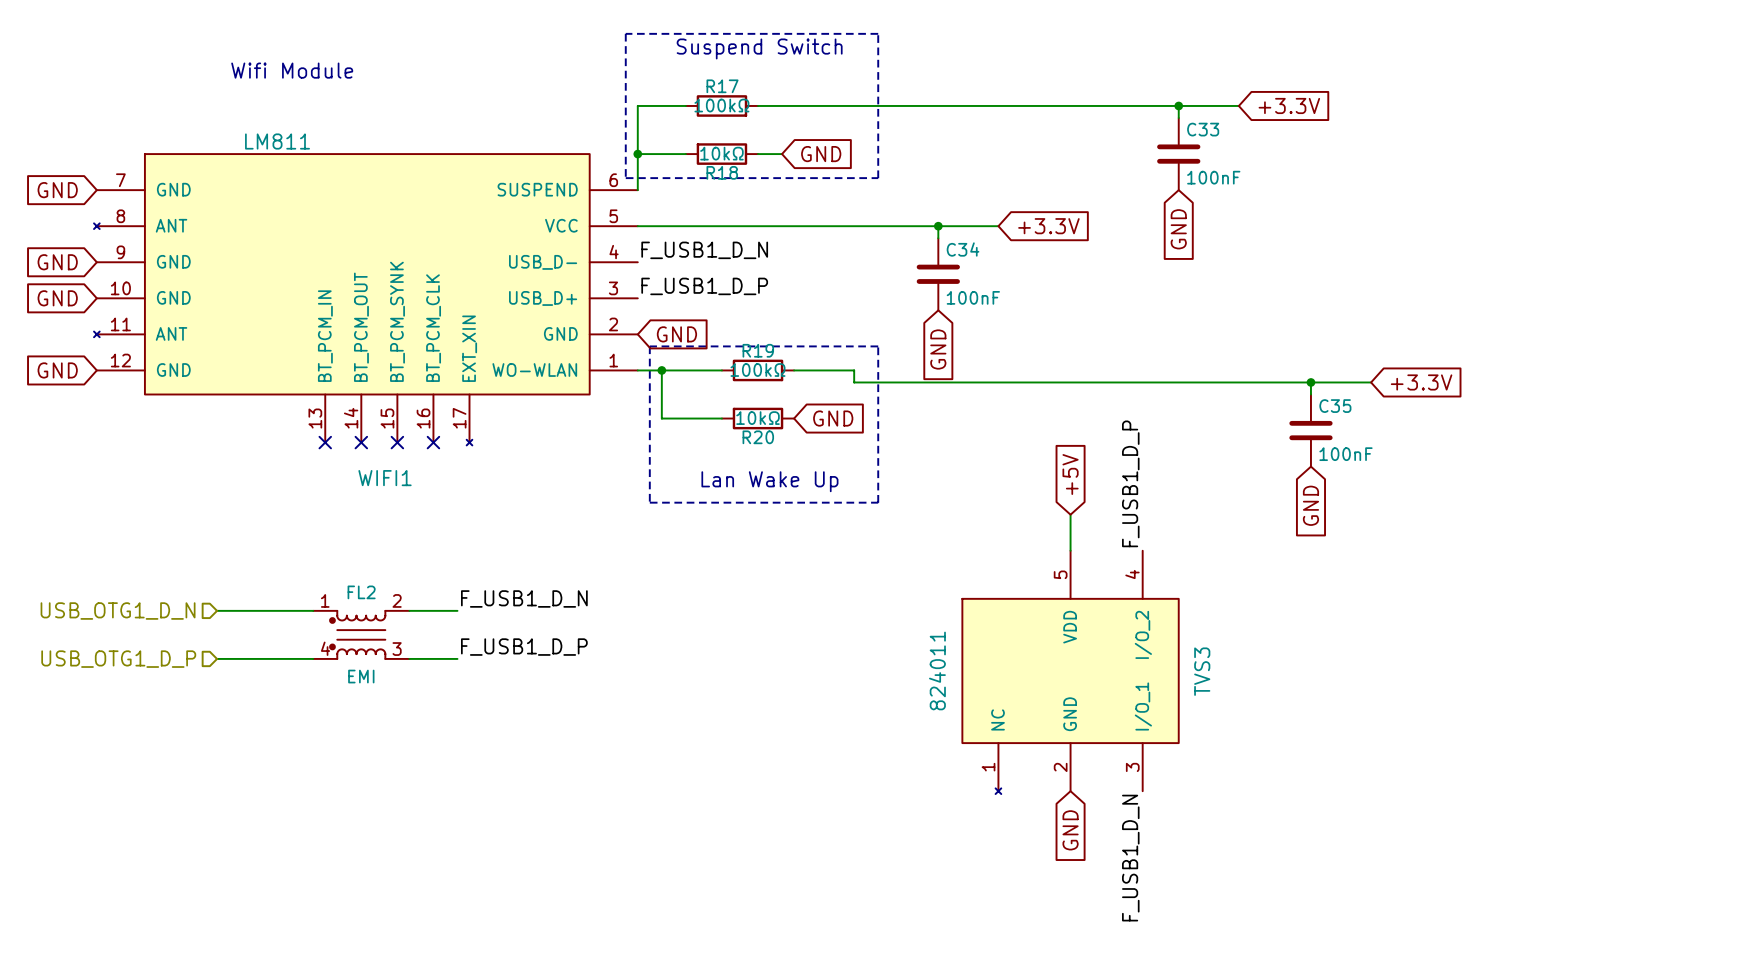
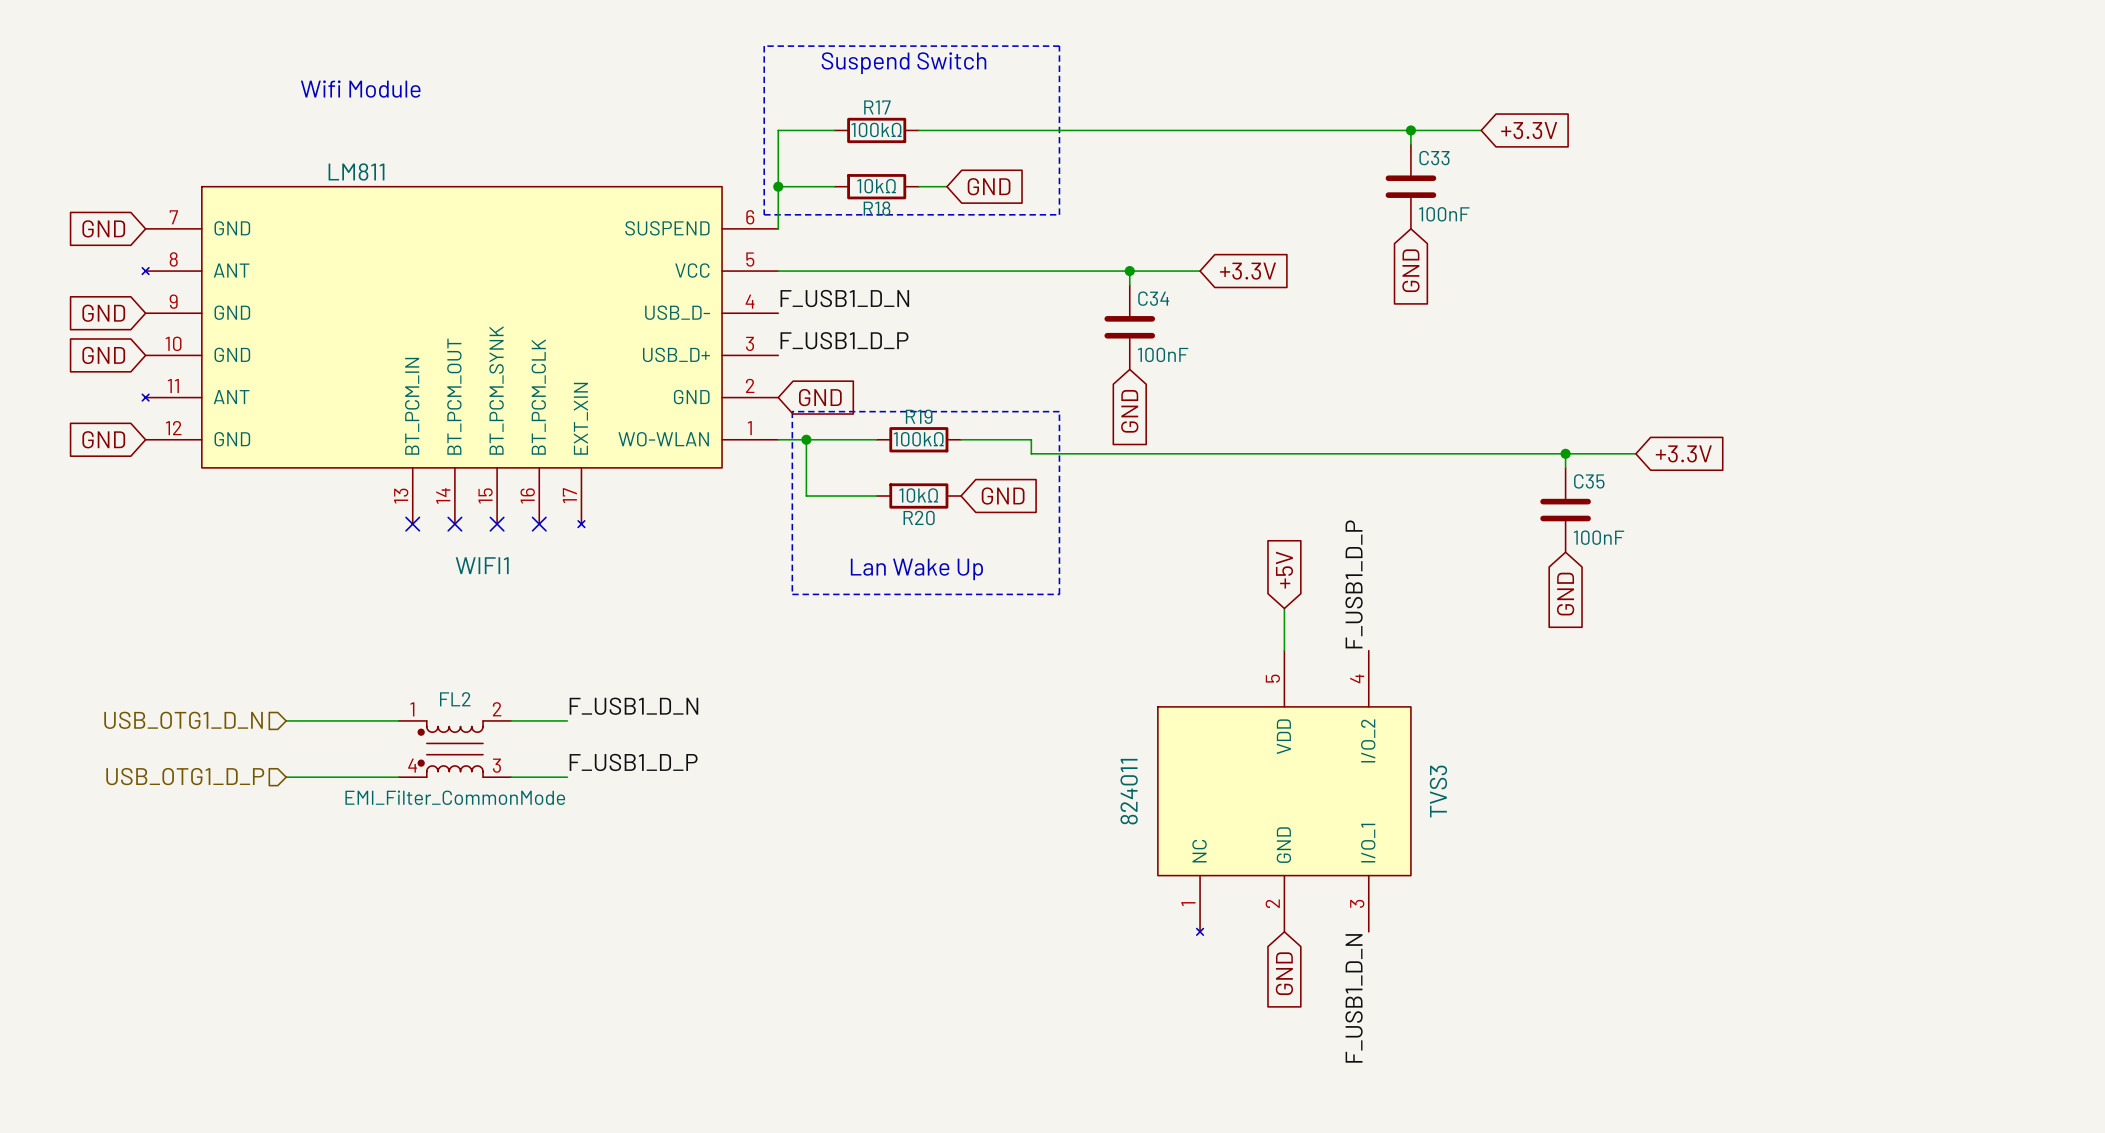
FL2 value: EMI (361, 676) -> EMI_Filter_CommonMode (455, 797)

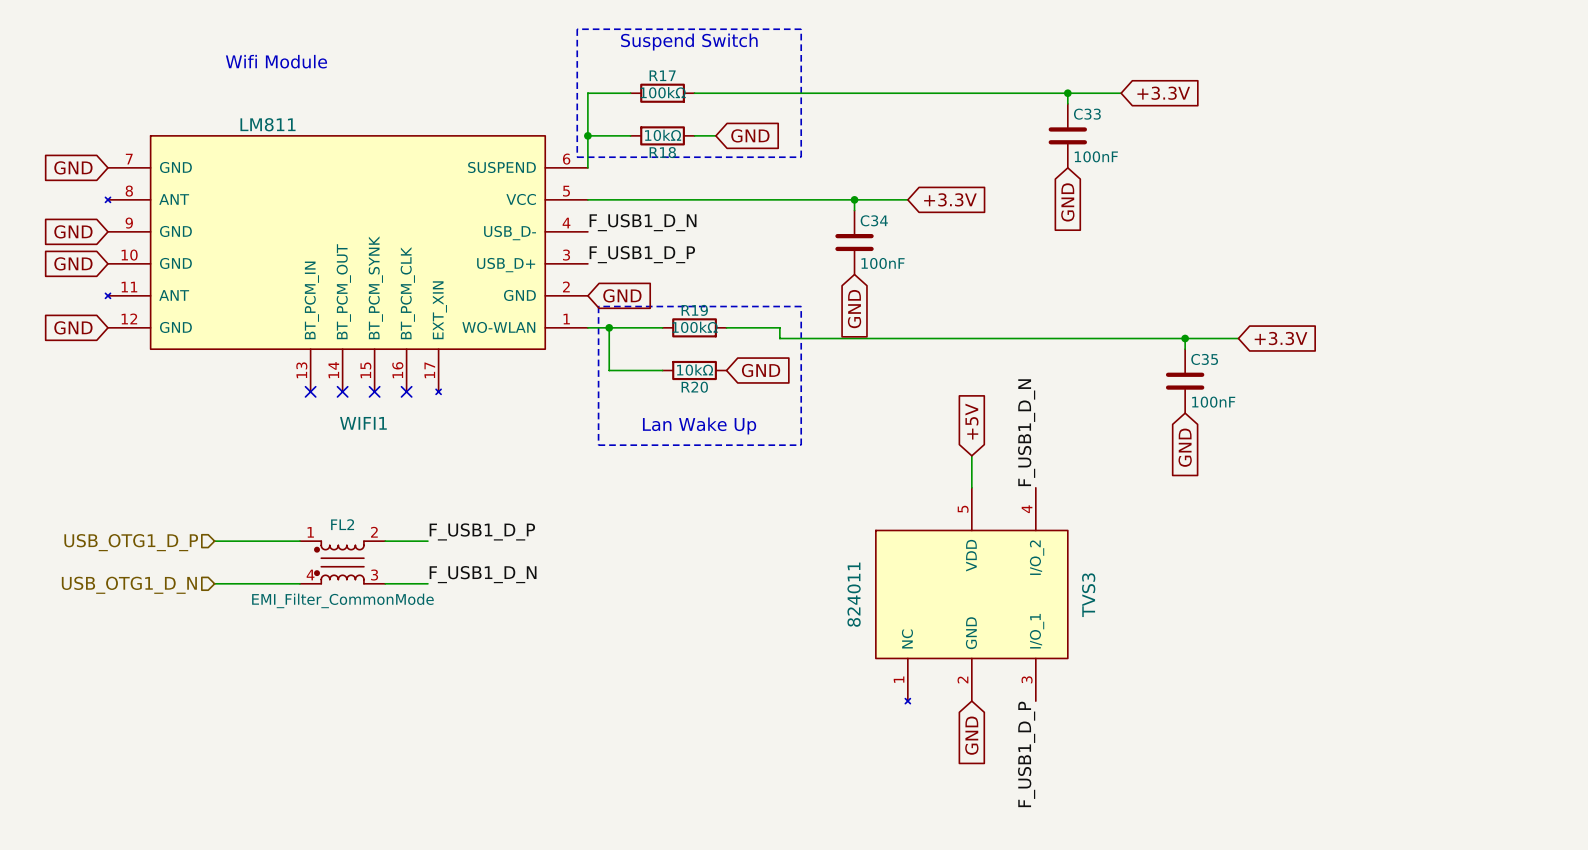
label: F_USB1_D_P (1354, 584) -> F_USB1_D_N (1026, 432)
label: F_USB1_D_N (633, 706) -> F_USB1_D_P (482, 531)
hierarchical label: USB_OTG1_D_N (183, 720) -> USB_OTG1_D_P (131, 542)
label: F_USB1_D_P (633, 762) -> F_USB1_D_N (483, 574)
hierarchical label: USB_OTG1_D_P (185, 776) -> USB_OTG1_D_N (129, 585)
label: F_USB1_D_N (1354, 998) -> F_USB1_D_P (1026, 754)

